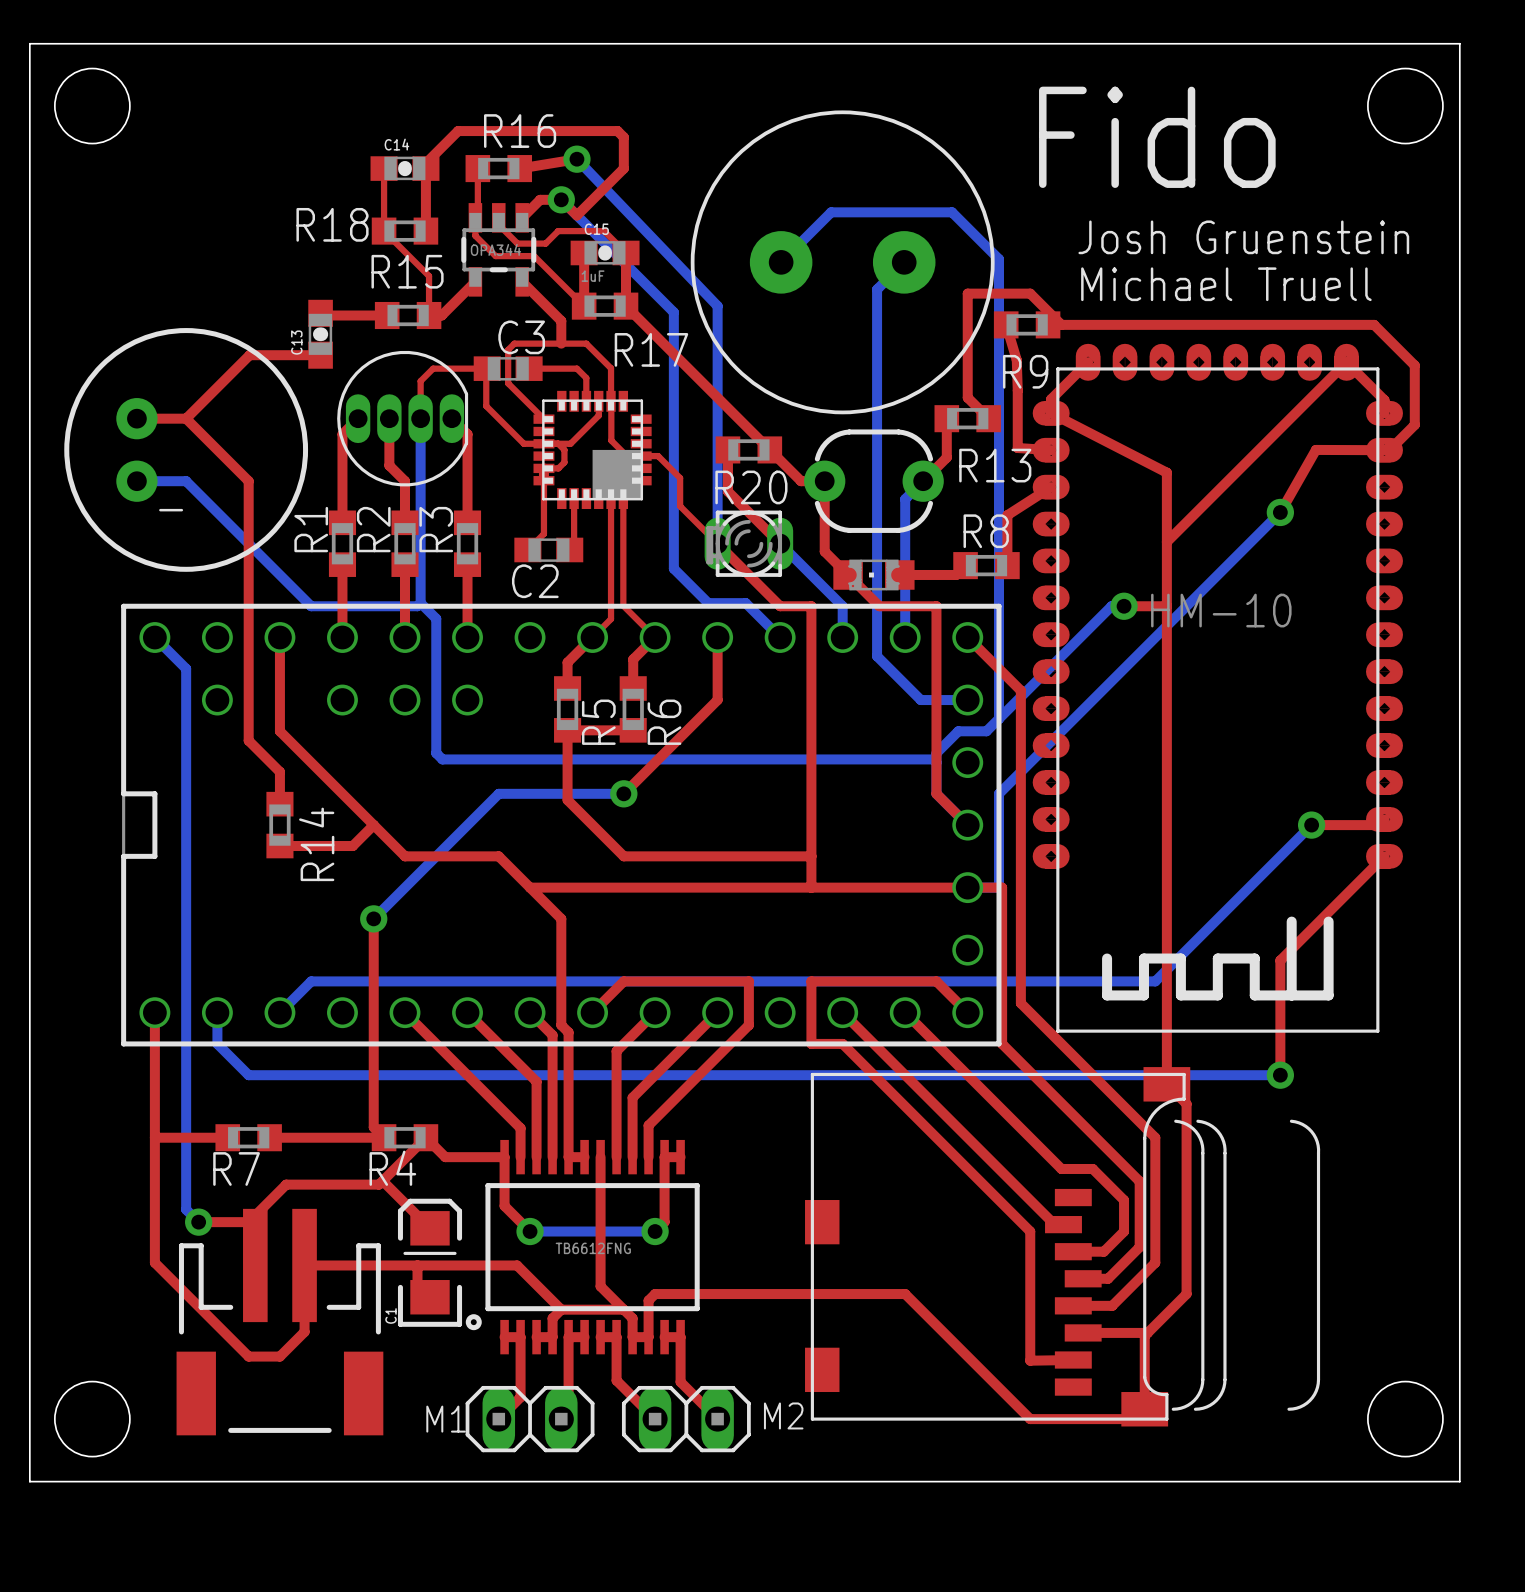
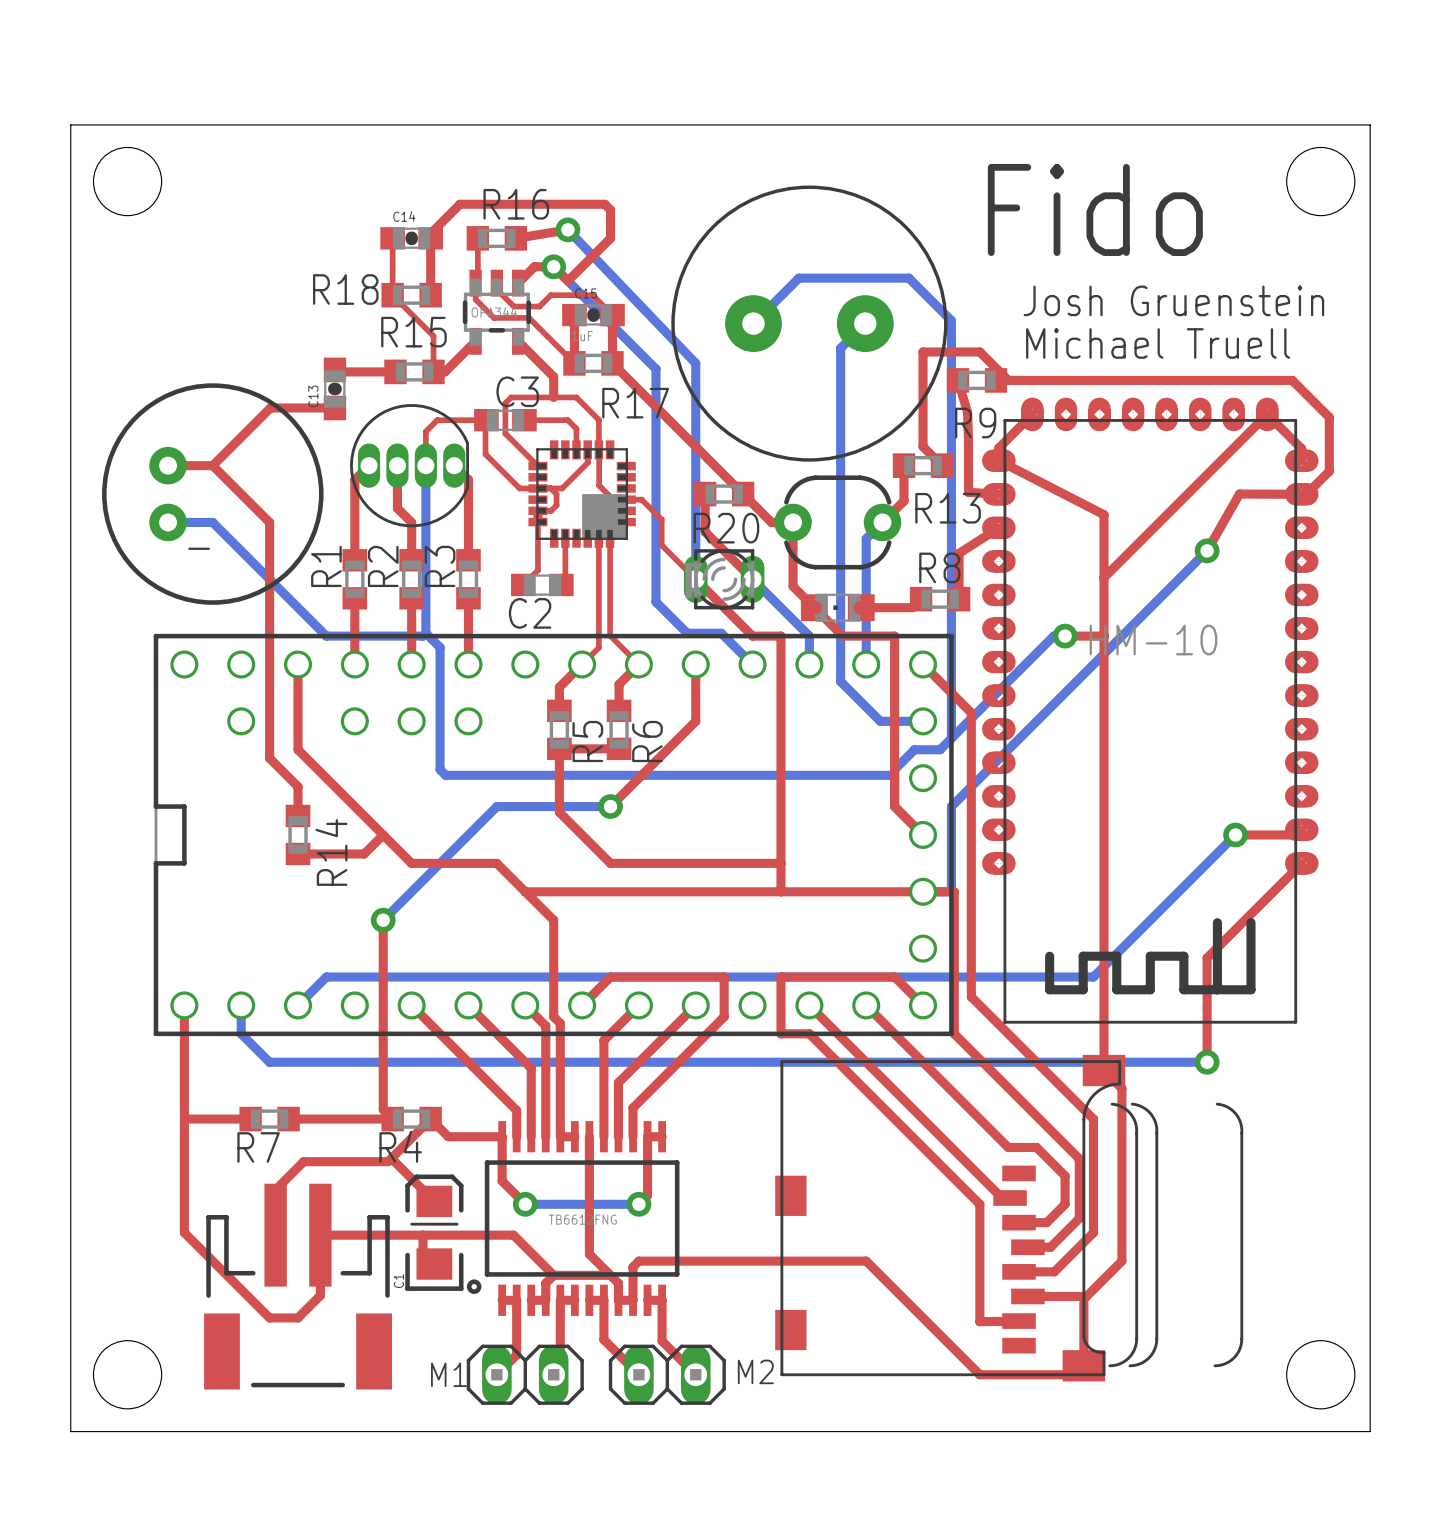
bottom track: (154, 637) (186, 668) (186, 1209) (198, 1222) -> none
top track: (198, 1222) (248, 1222) -> none
via: (198, 1222) -> none

